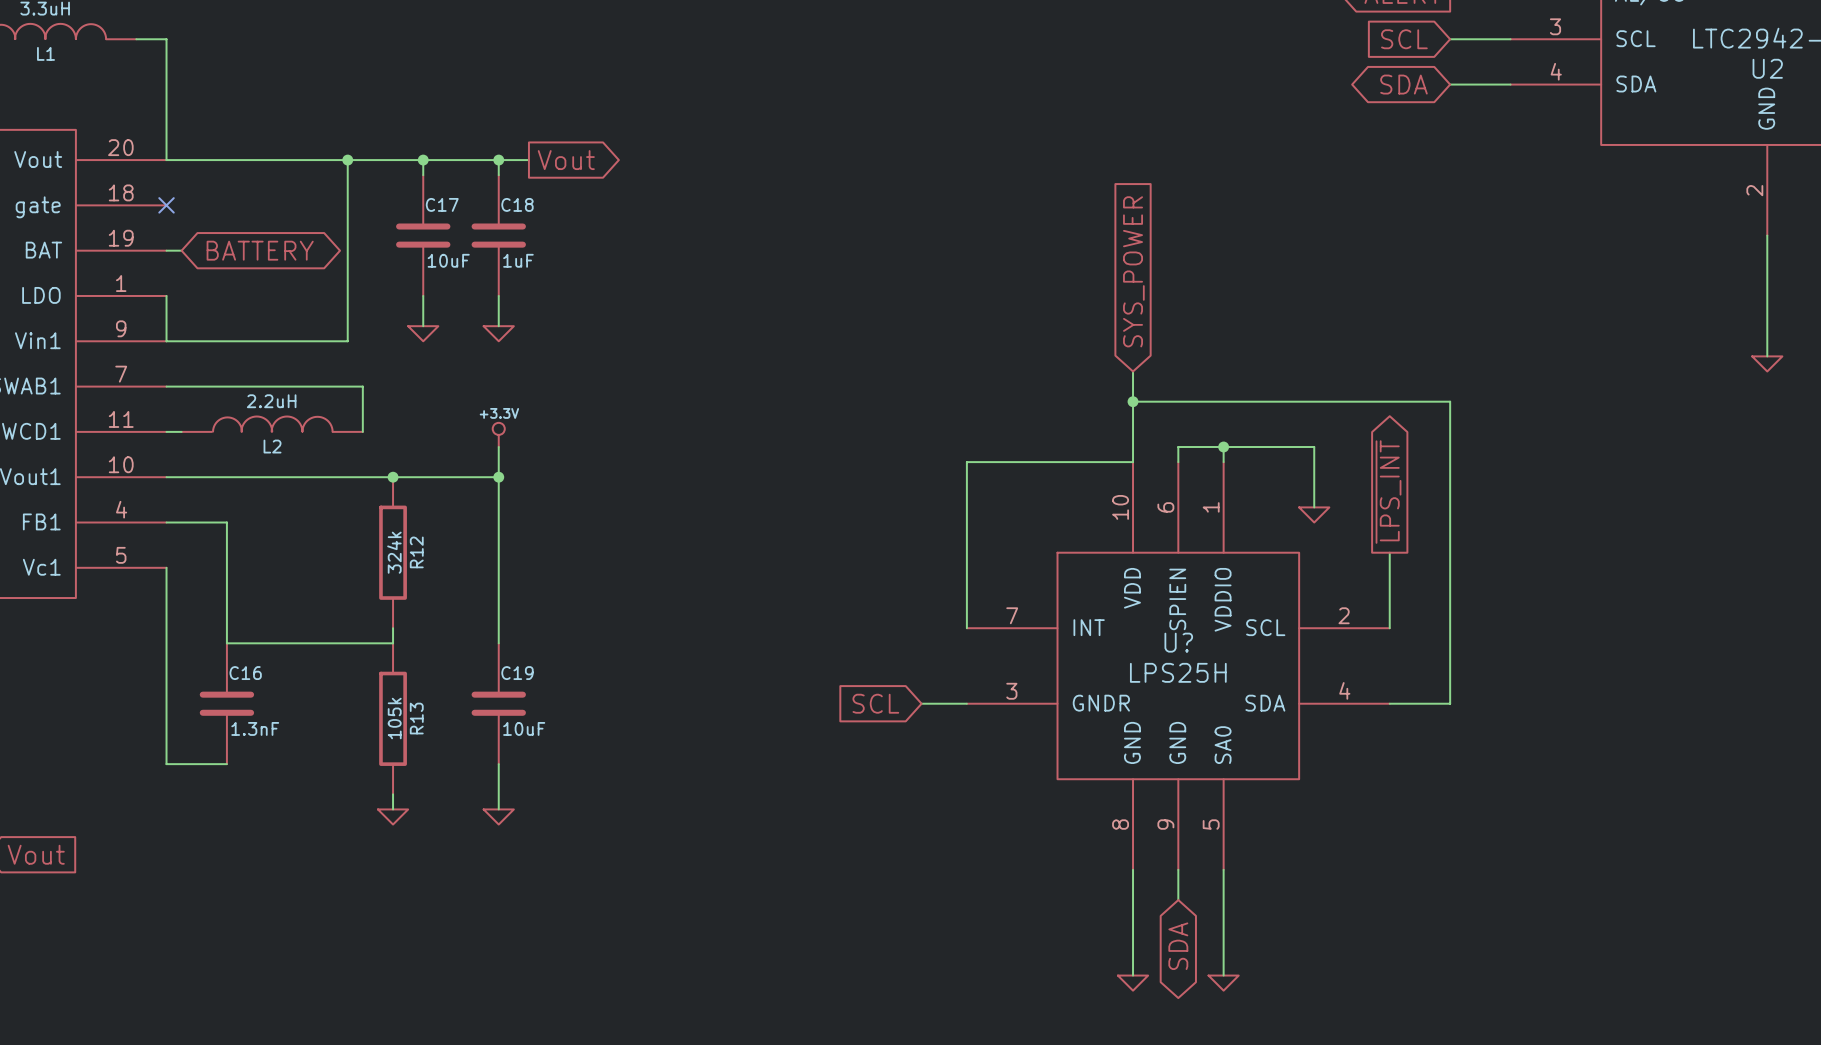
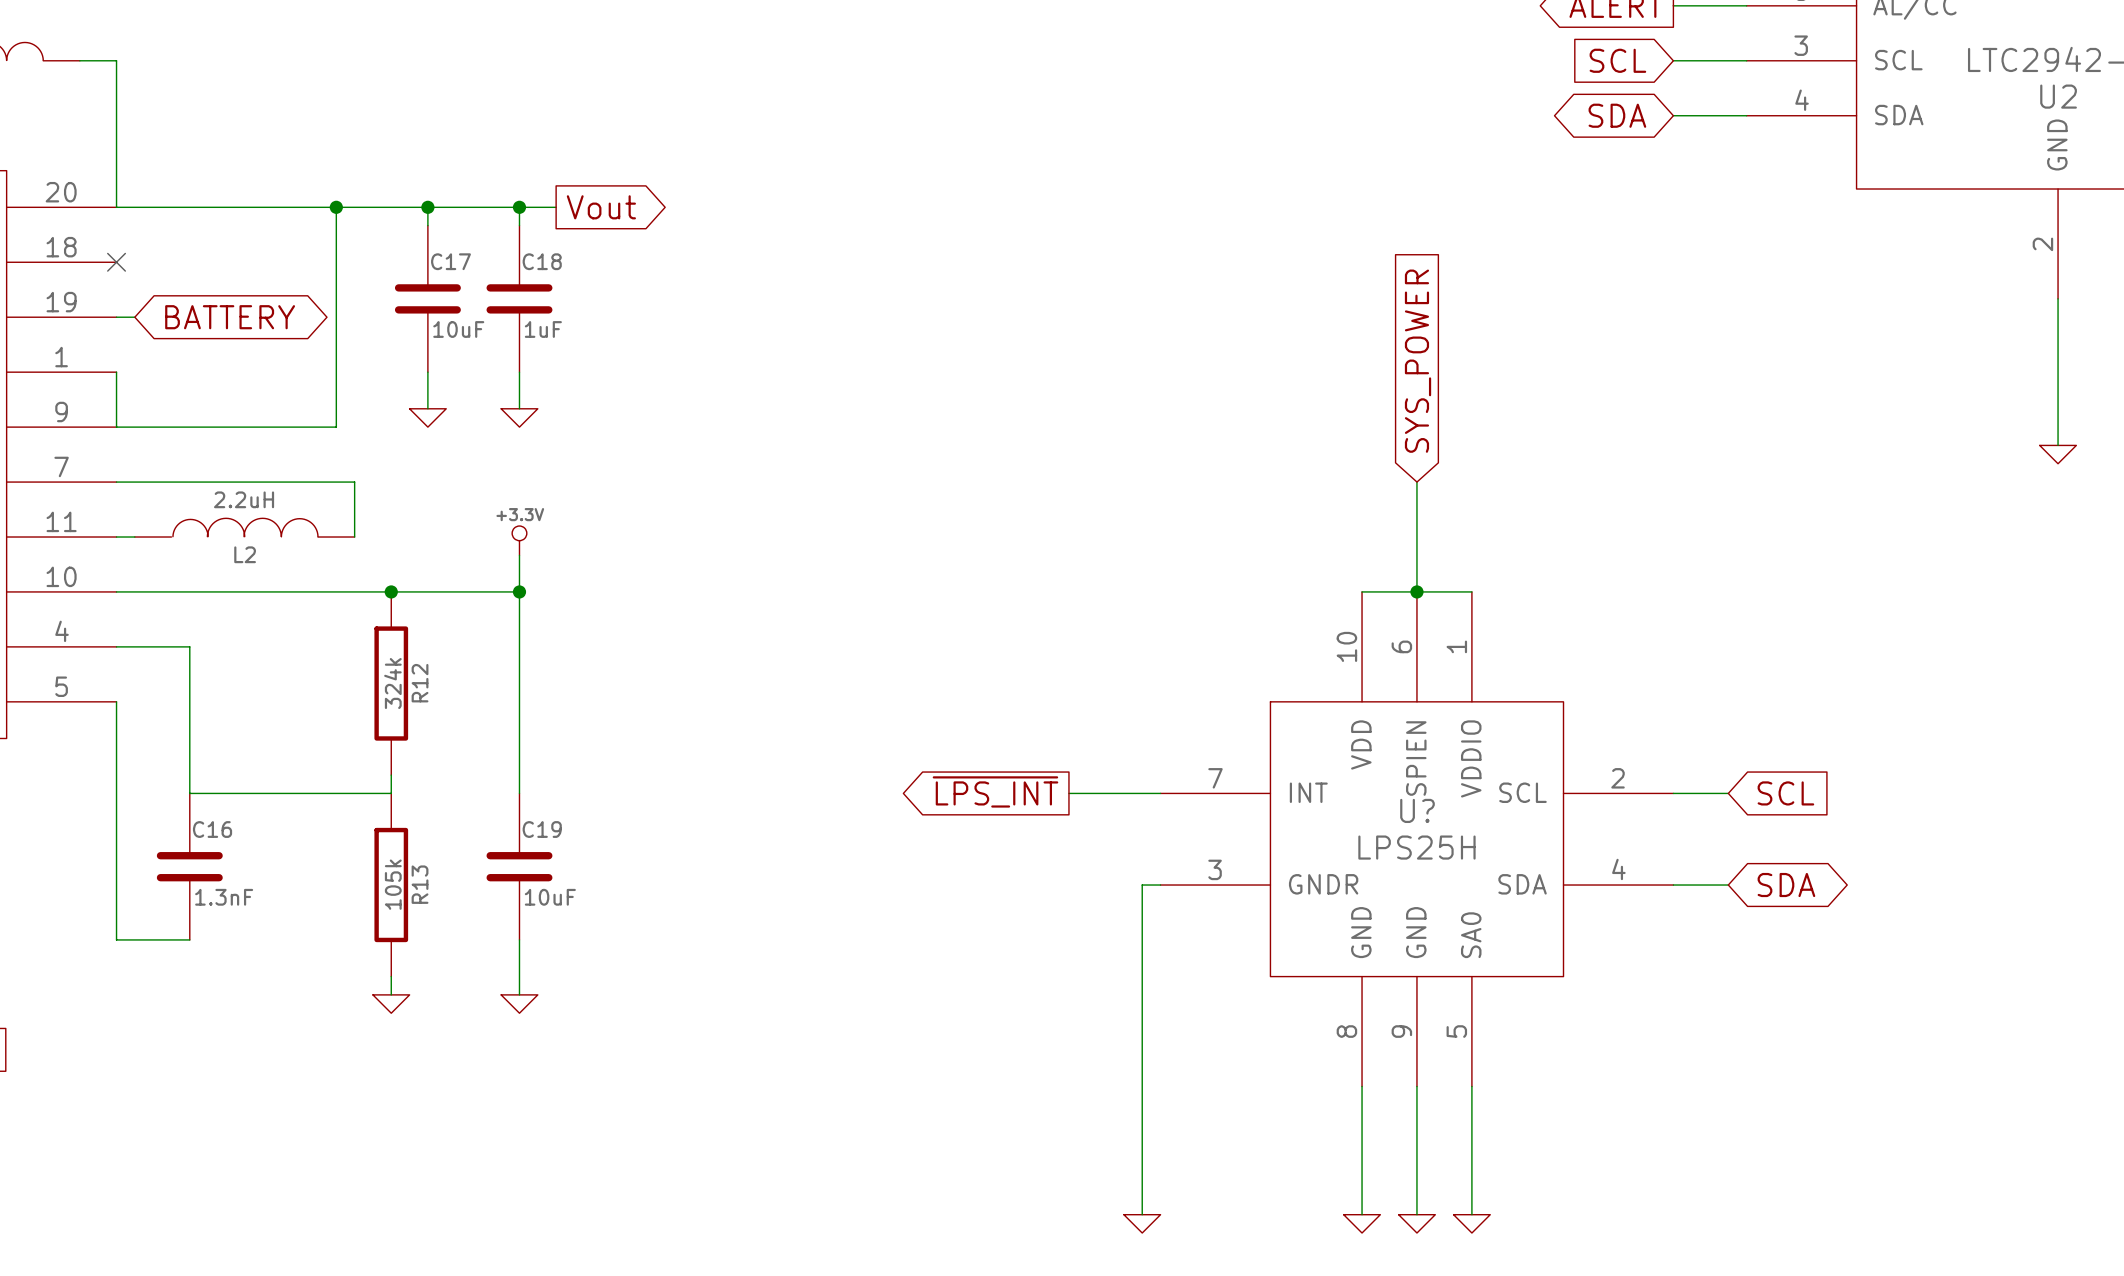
global label position: SYS_POWER (1133, 271) -> SYS_POWER (1418, 361)
wire: (1133, 371) (1133, 462) (966, 462) (966, 628) -> none
wire: none -> (1416, 482) (1416, 591)
wire: (1133, 401) (1450, 401) (1450, 703) (1389, 703) -> none
junction: (1133, 401) -> none
wire: (1223, 447) (1223, 462) -> none
junction position: (1223, 447) -> (1416, 591)
wire: (1178, 462) (1178, 447) (1314, 447) (1314, 507) -> none
wire: none -> (1362, 591) (1471, 591)
global label: ~{LPS_INT} (1388, 492) -> none
power symbol: (1314, 514) -> none
wire: (1389, 552) (1389, 628) -> none
global label: none -> ~{LPS_INT} (995, 791)
wire: none -> (1068, 793) (1160, 793)
wire: none -> (1673, 793) (1728, 793)
global label: none -> SCL (1785, 793)
U? position: (1178, 665) -> (1416, 839)
global label: SCL (875, 703) -> none
wire: (921, 703) (966, 703) -> none
wire: none -> (1160, 885) (1142, 885) (1142, 1214)
wire: none -> (1673, 885) (1728, 885)
global label: none -> SDA (1786, 885)
wire: (1133, 869) (1133, 975) -> (1362, 1086) (1362, 1214)
wire: (1178, 869) (1178, 900) -> none
wire: (1223, 869) (1223, 975) -> (1471, 1086) (1471, 1214)
wire: none -> (1416, 1086) (1416, 1214)
global label: SDA (1178, 946) -> none
power symbol: (1133, 983) -> none
power symbol: (1223, 983) -> none
power symbol: none -> (1142, 1223)
power symbol: none -> (1362, 1223)
power symbol: none -> (1416, 1223)
power symbol: none -> (1471, 1223)

